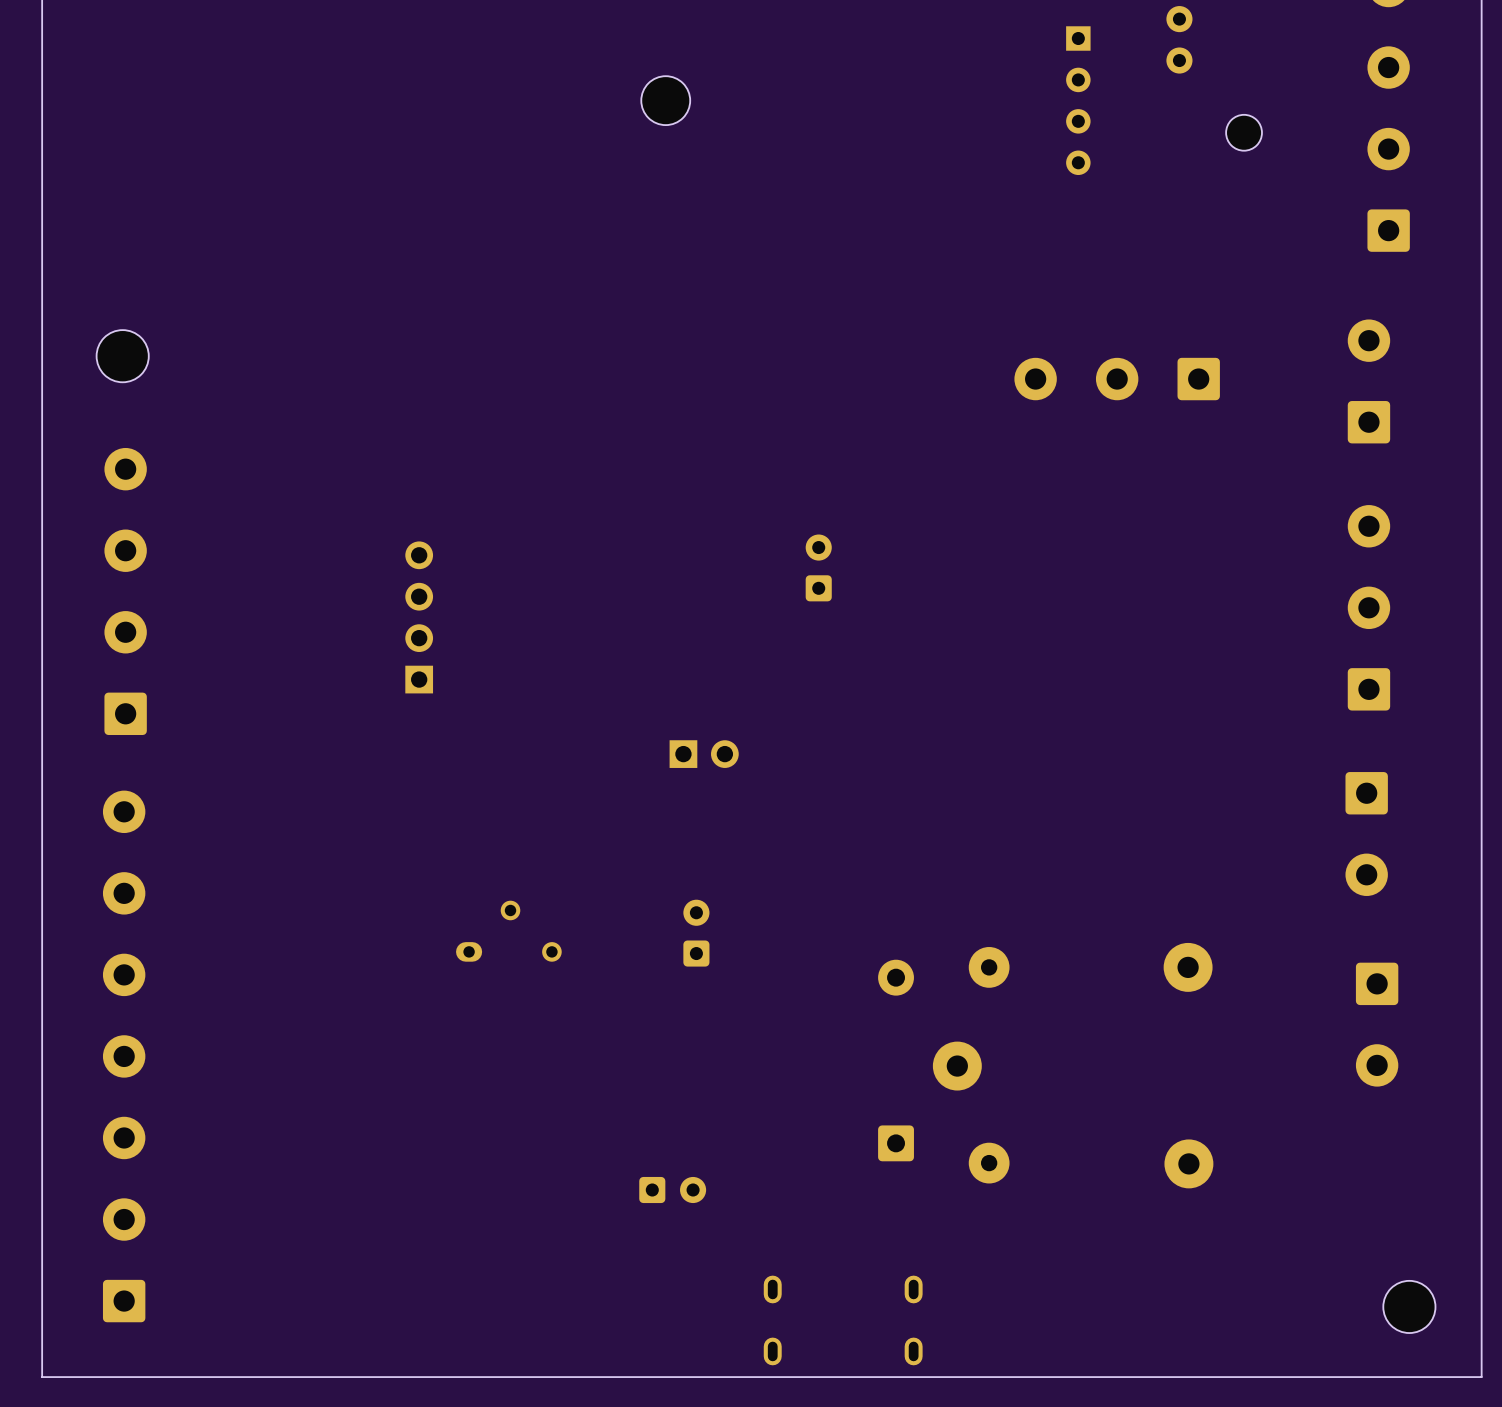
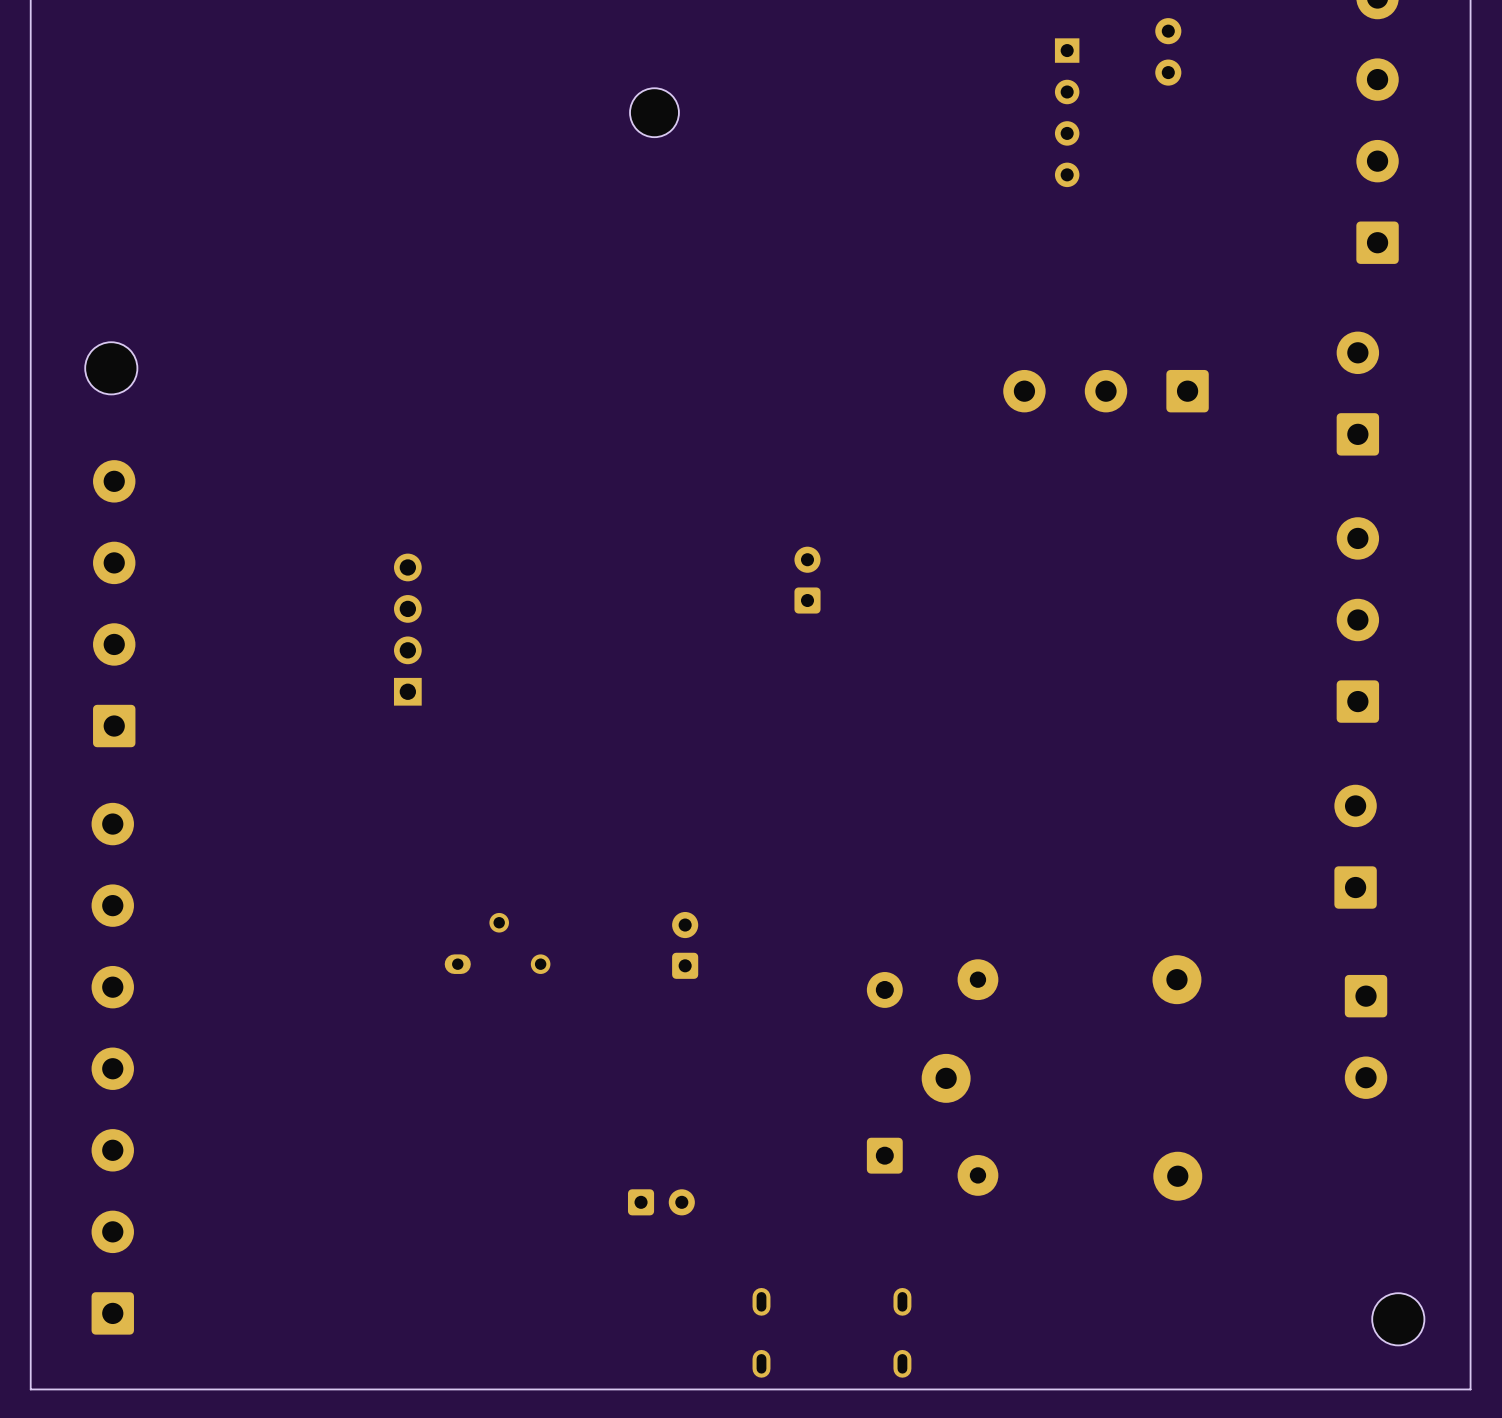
part: (1244, 132) -> none
part: (704, 754) -> none
part rotation: 0° (1366, 834) -> 180° (1355, 846)

